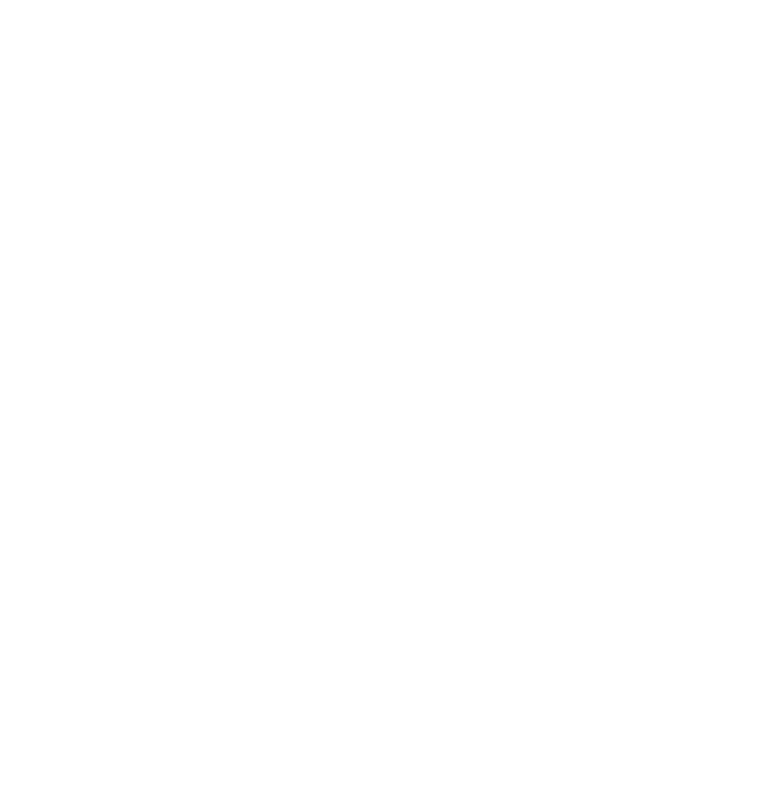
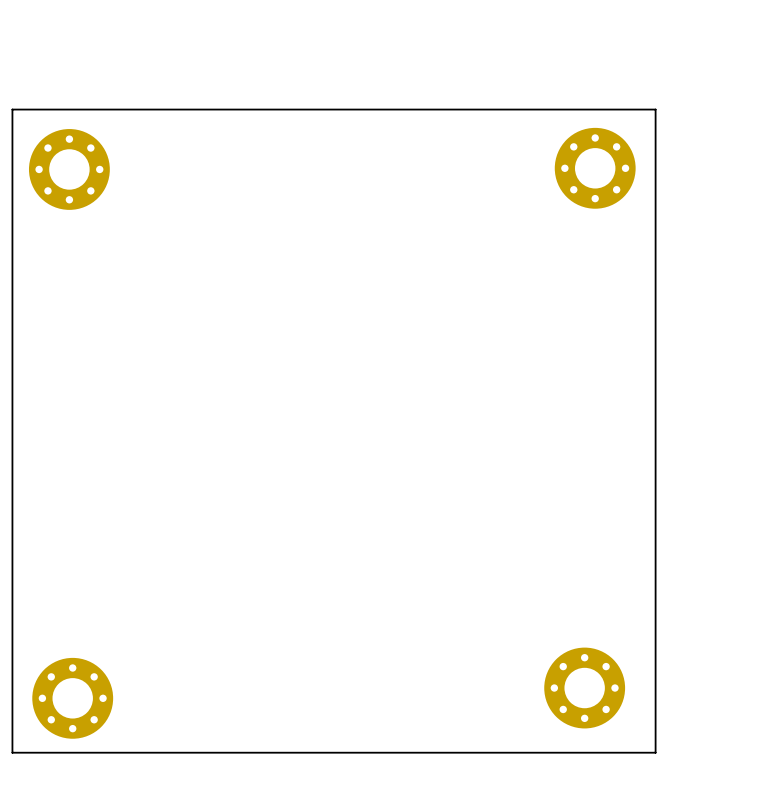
board edge: none -> (655, 109) (12, 109) (12, 752) (655, 752) (655, 109)
part: none -> (595, 168)
part: none -> (69, 169)
part: none -> (584, 688)
part: none -> (72, 698)

